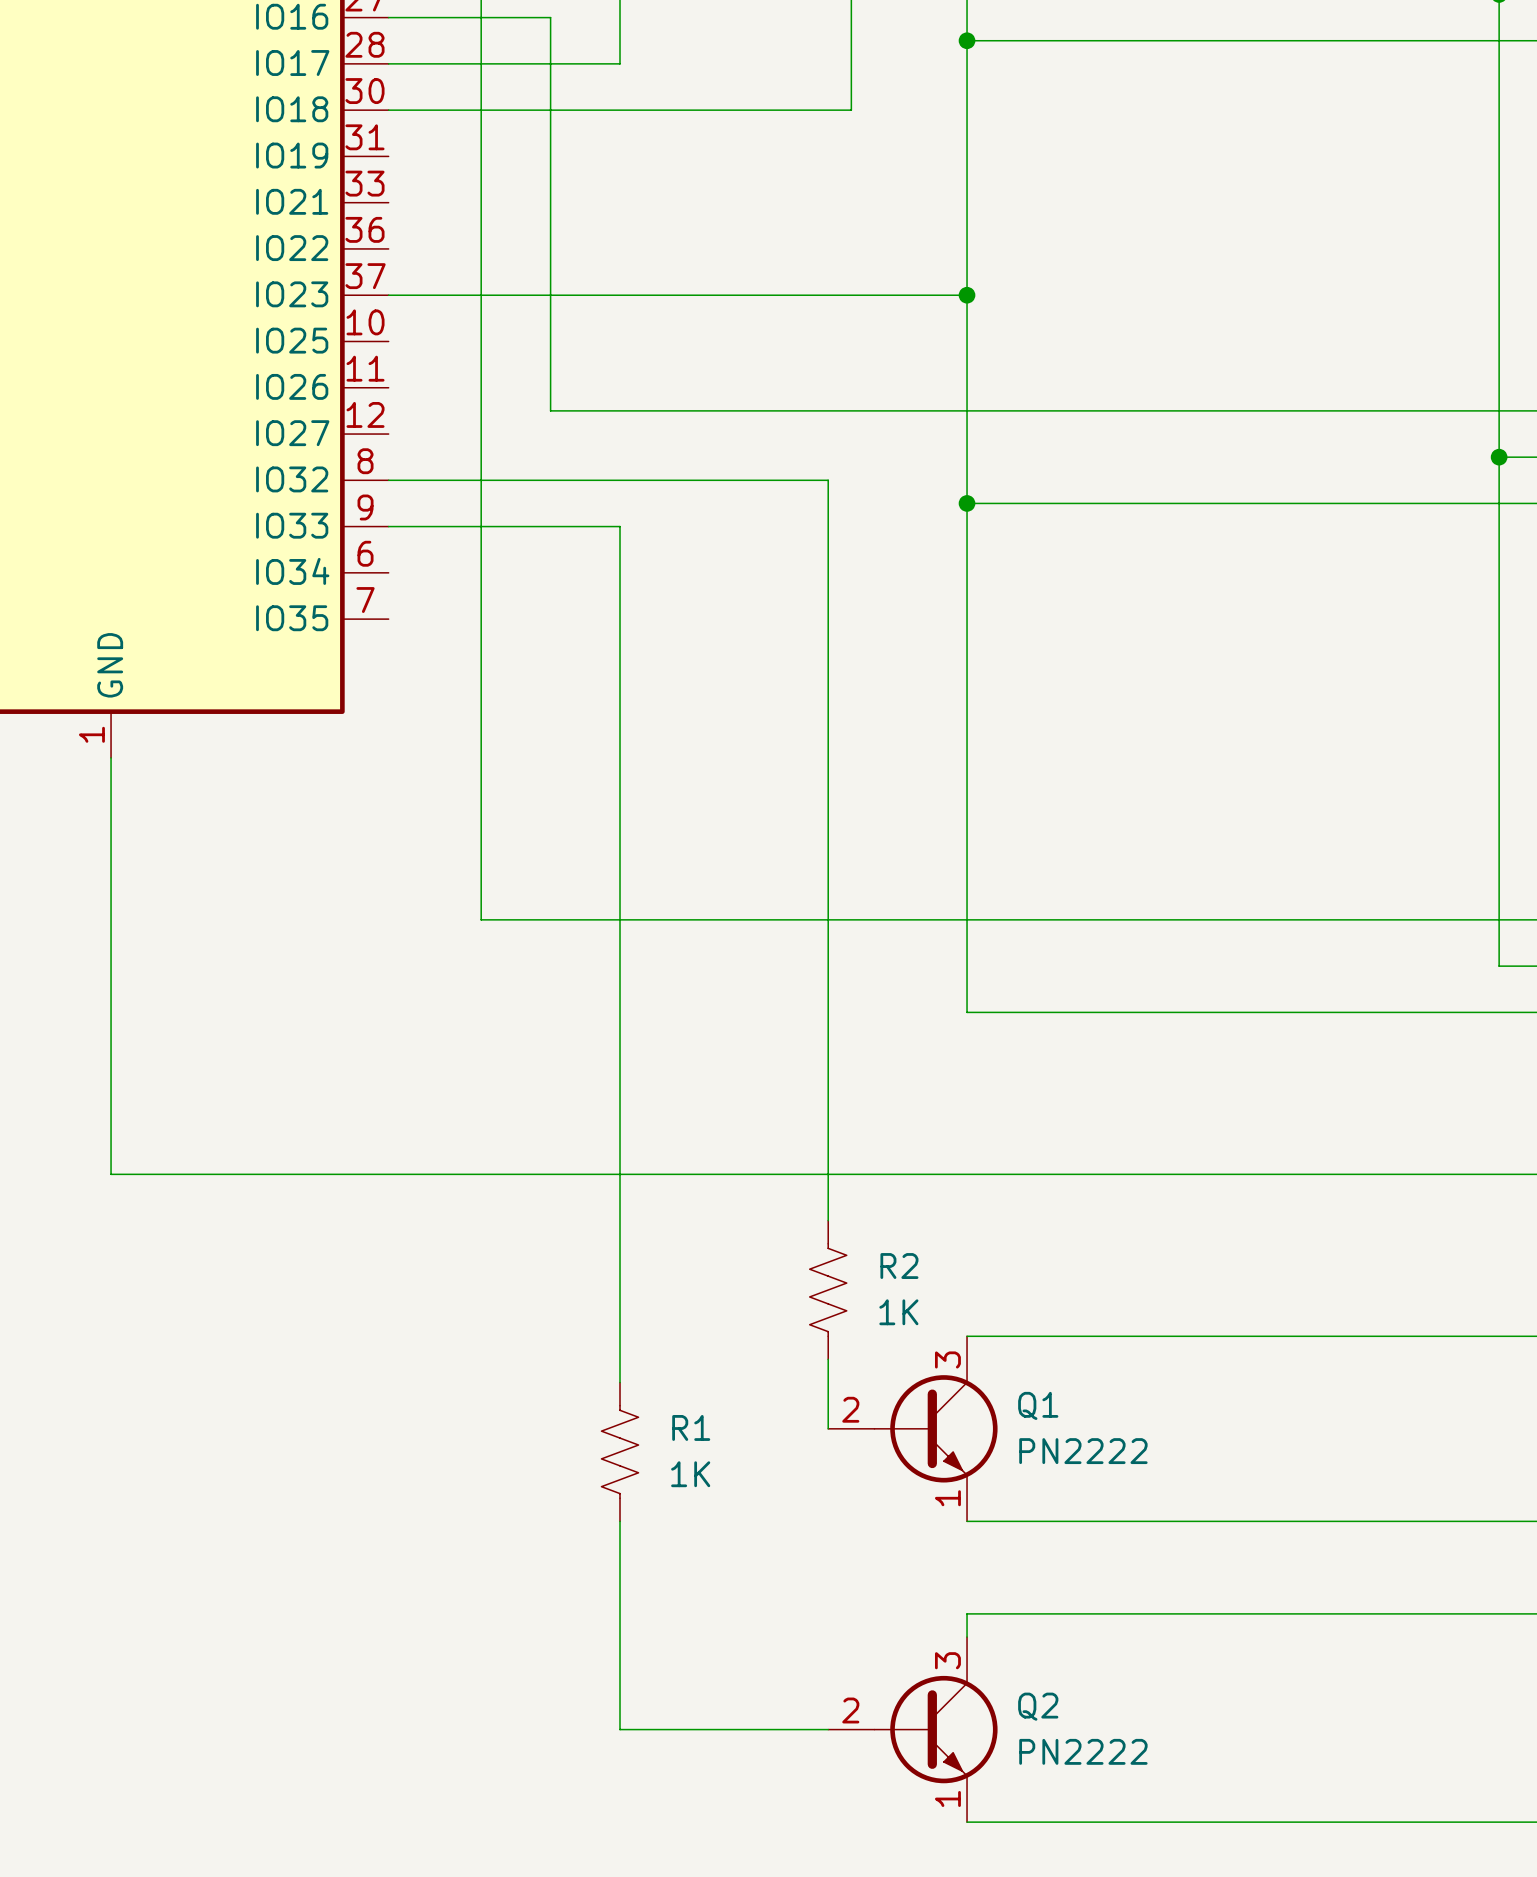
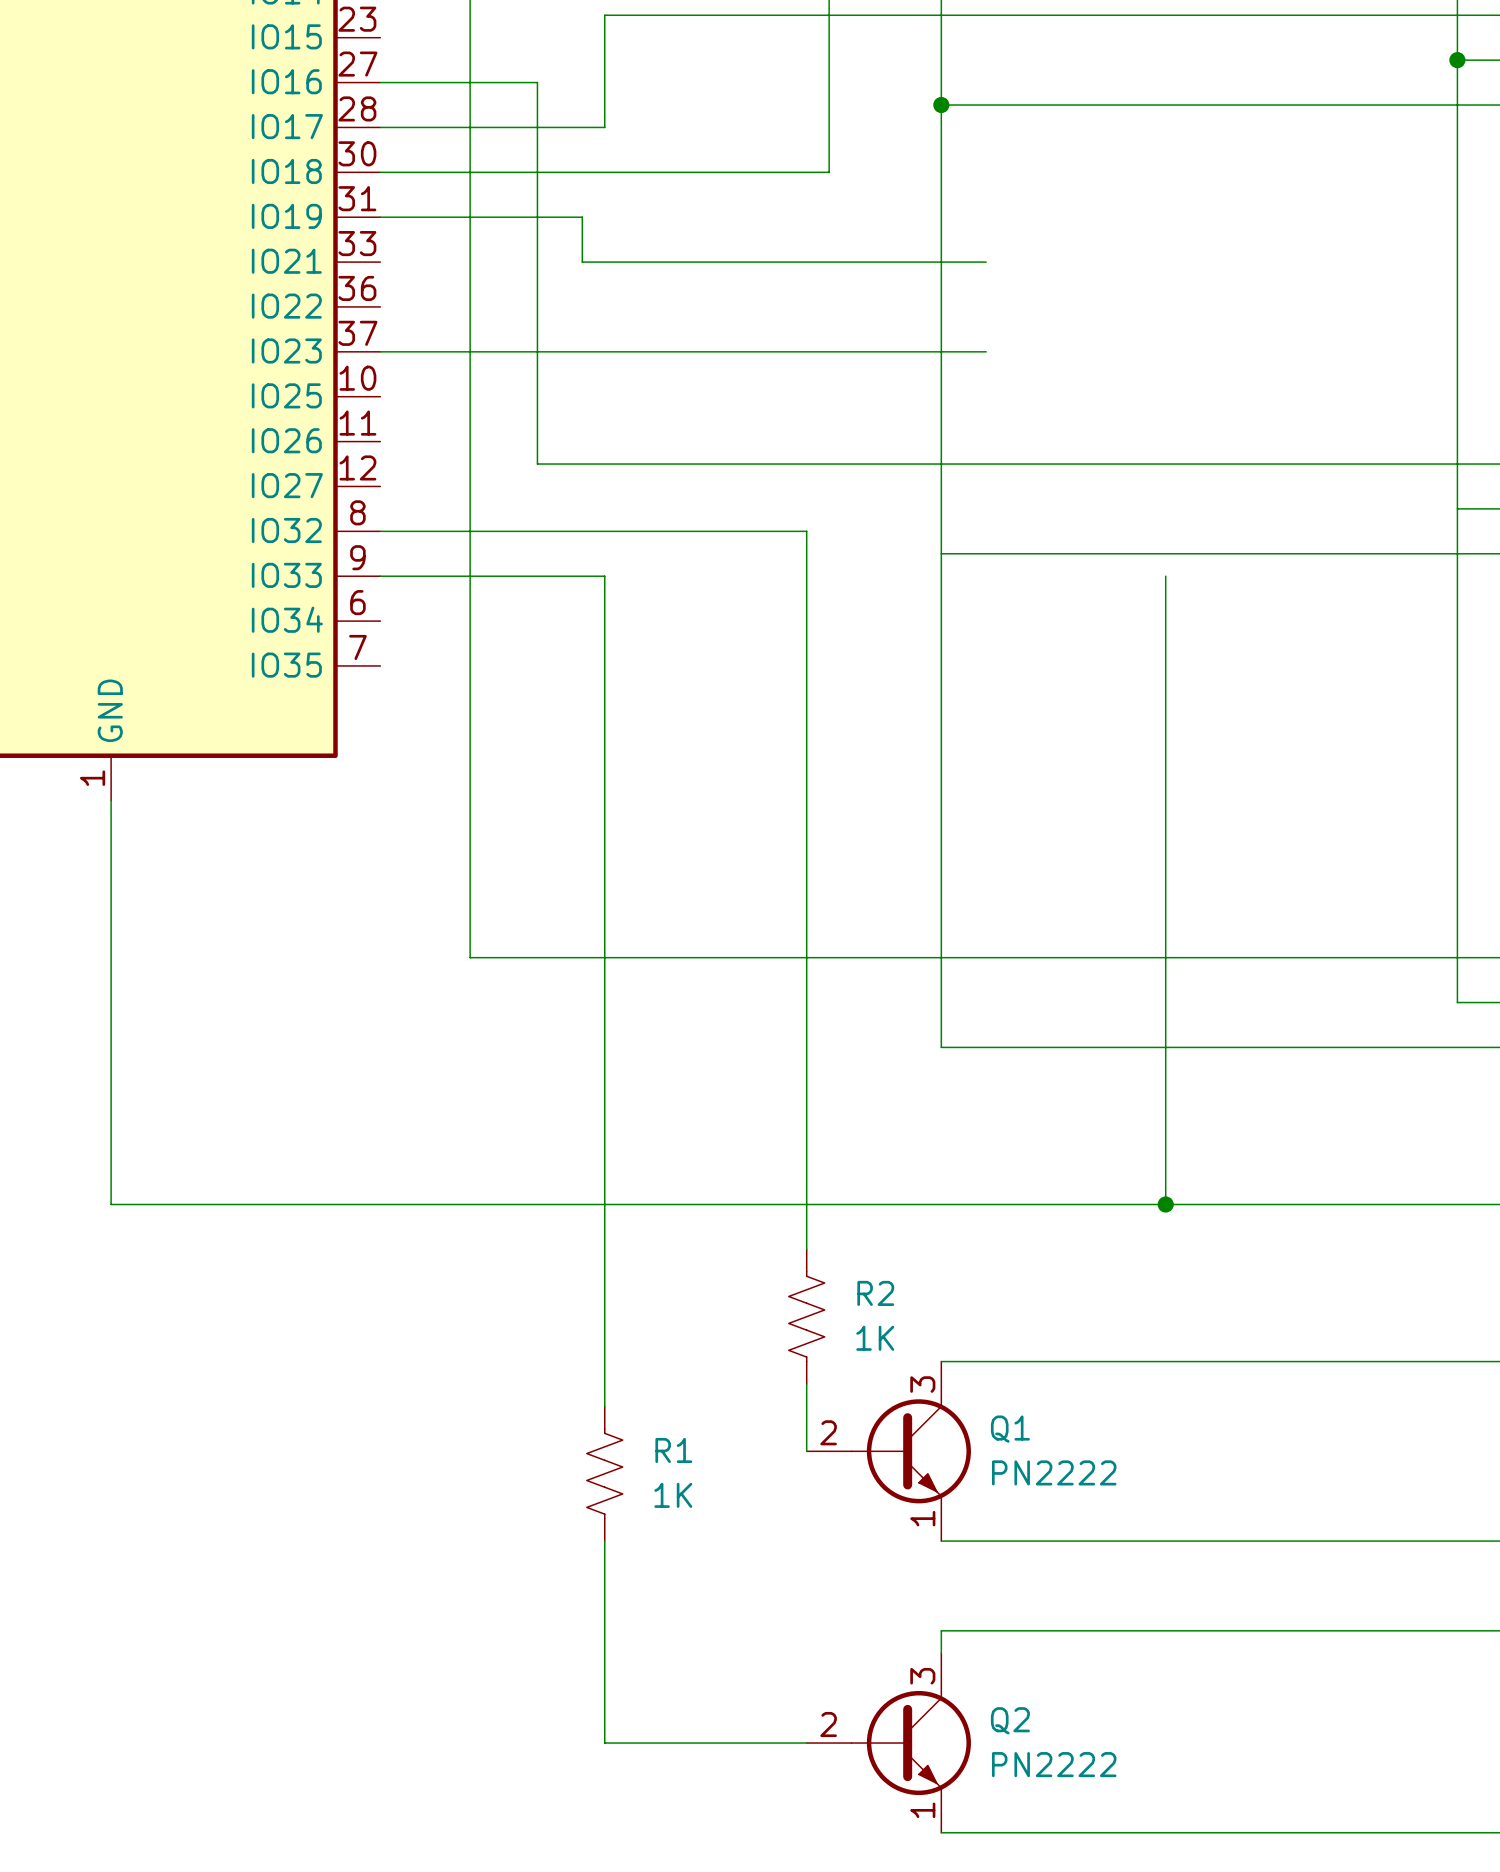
wire: none -> (380, 217) (582, 217) (582, 262) (986, 262)
wire: none -> (941, 351) (986, 351)
junction: (967, 295) -> none
junction: (1499, 457) -> none
junction: (967, 503) -> none
wire: none -> (1165, 576) (1165, 1204)
junction: none -> (1165, 1204)

